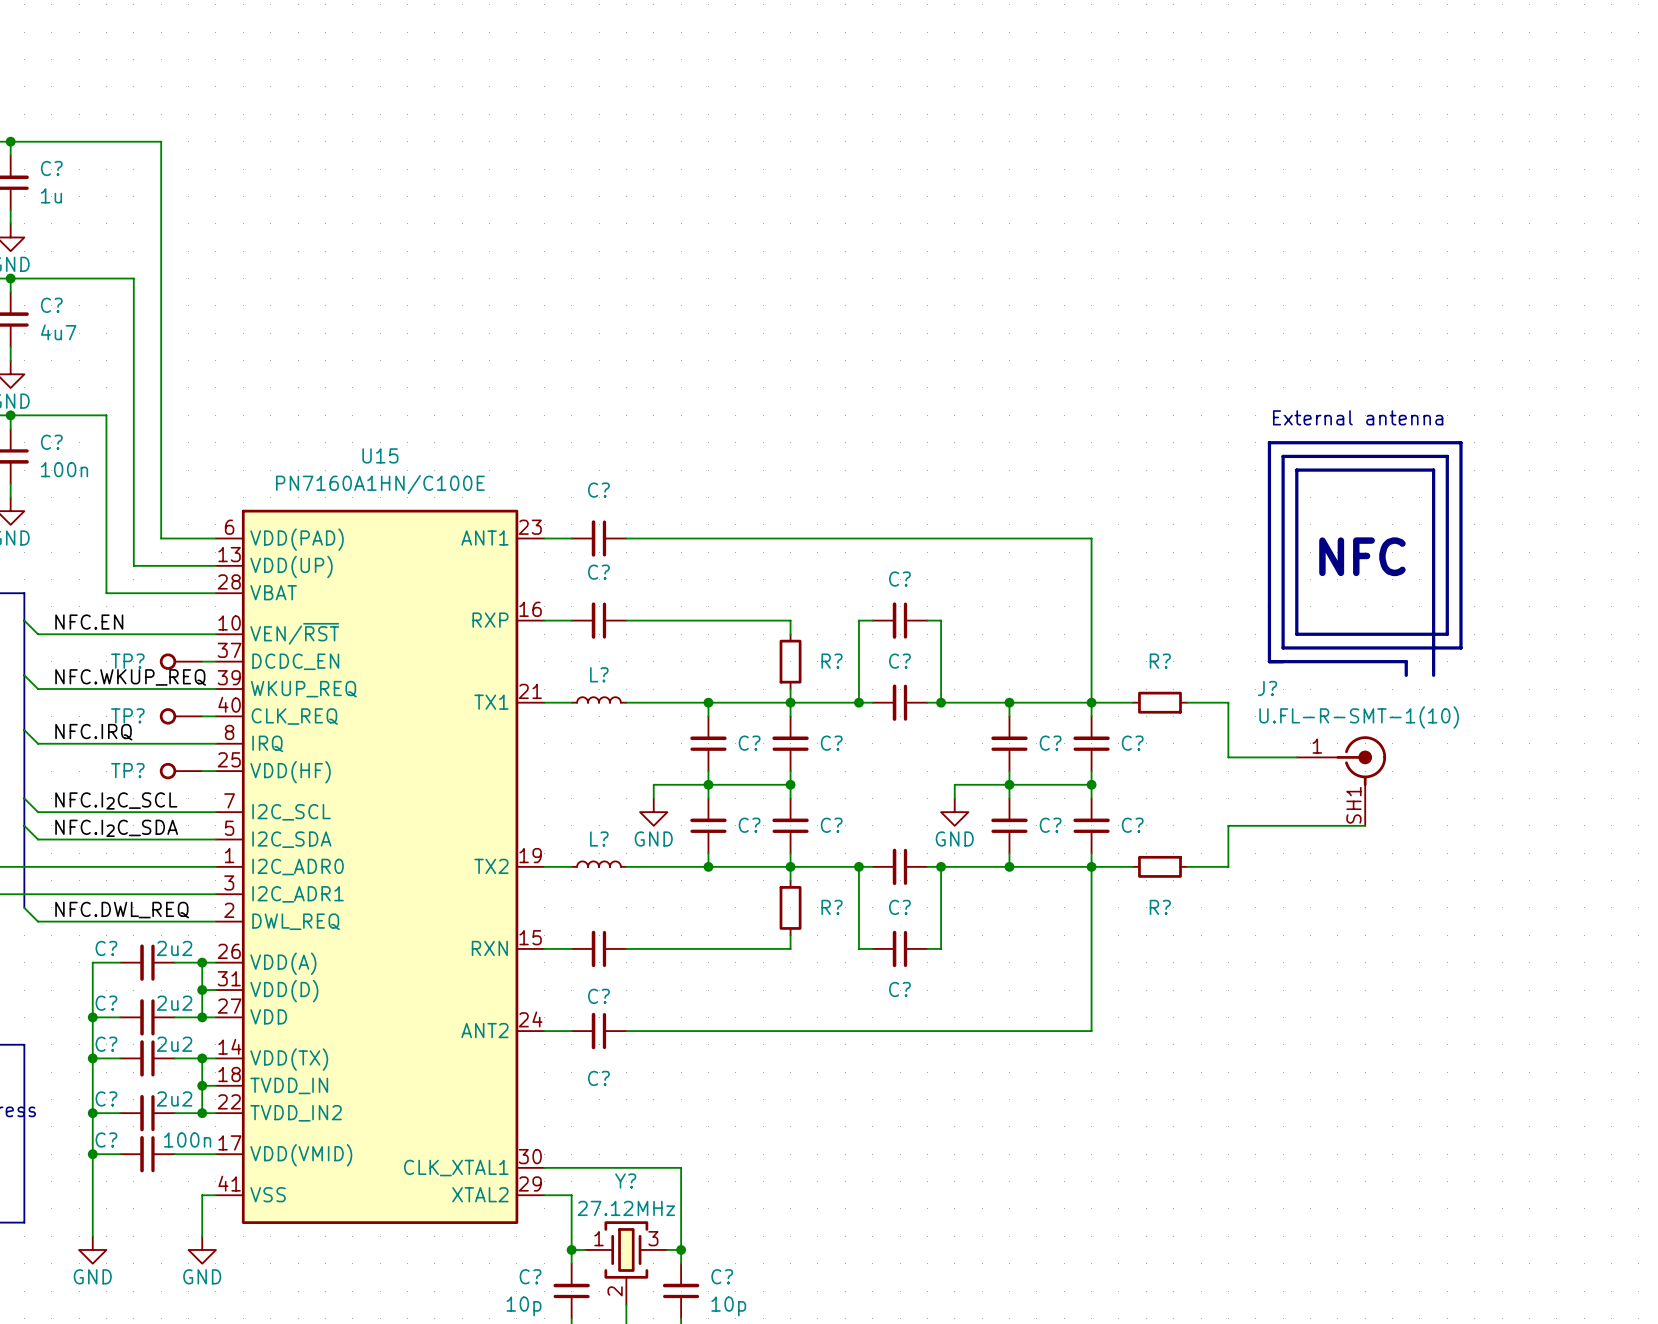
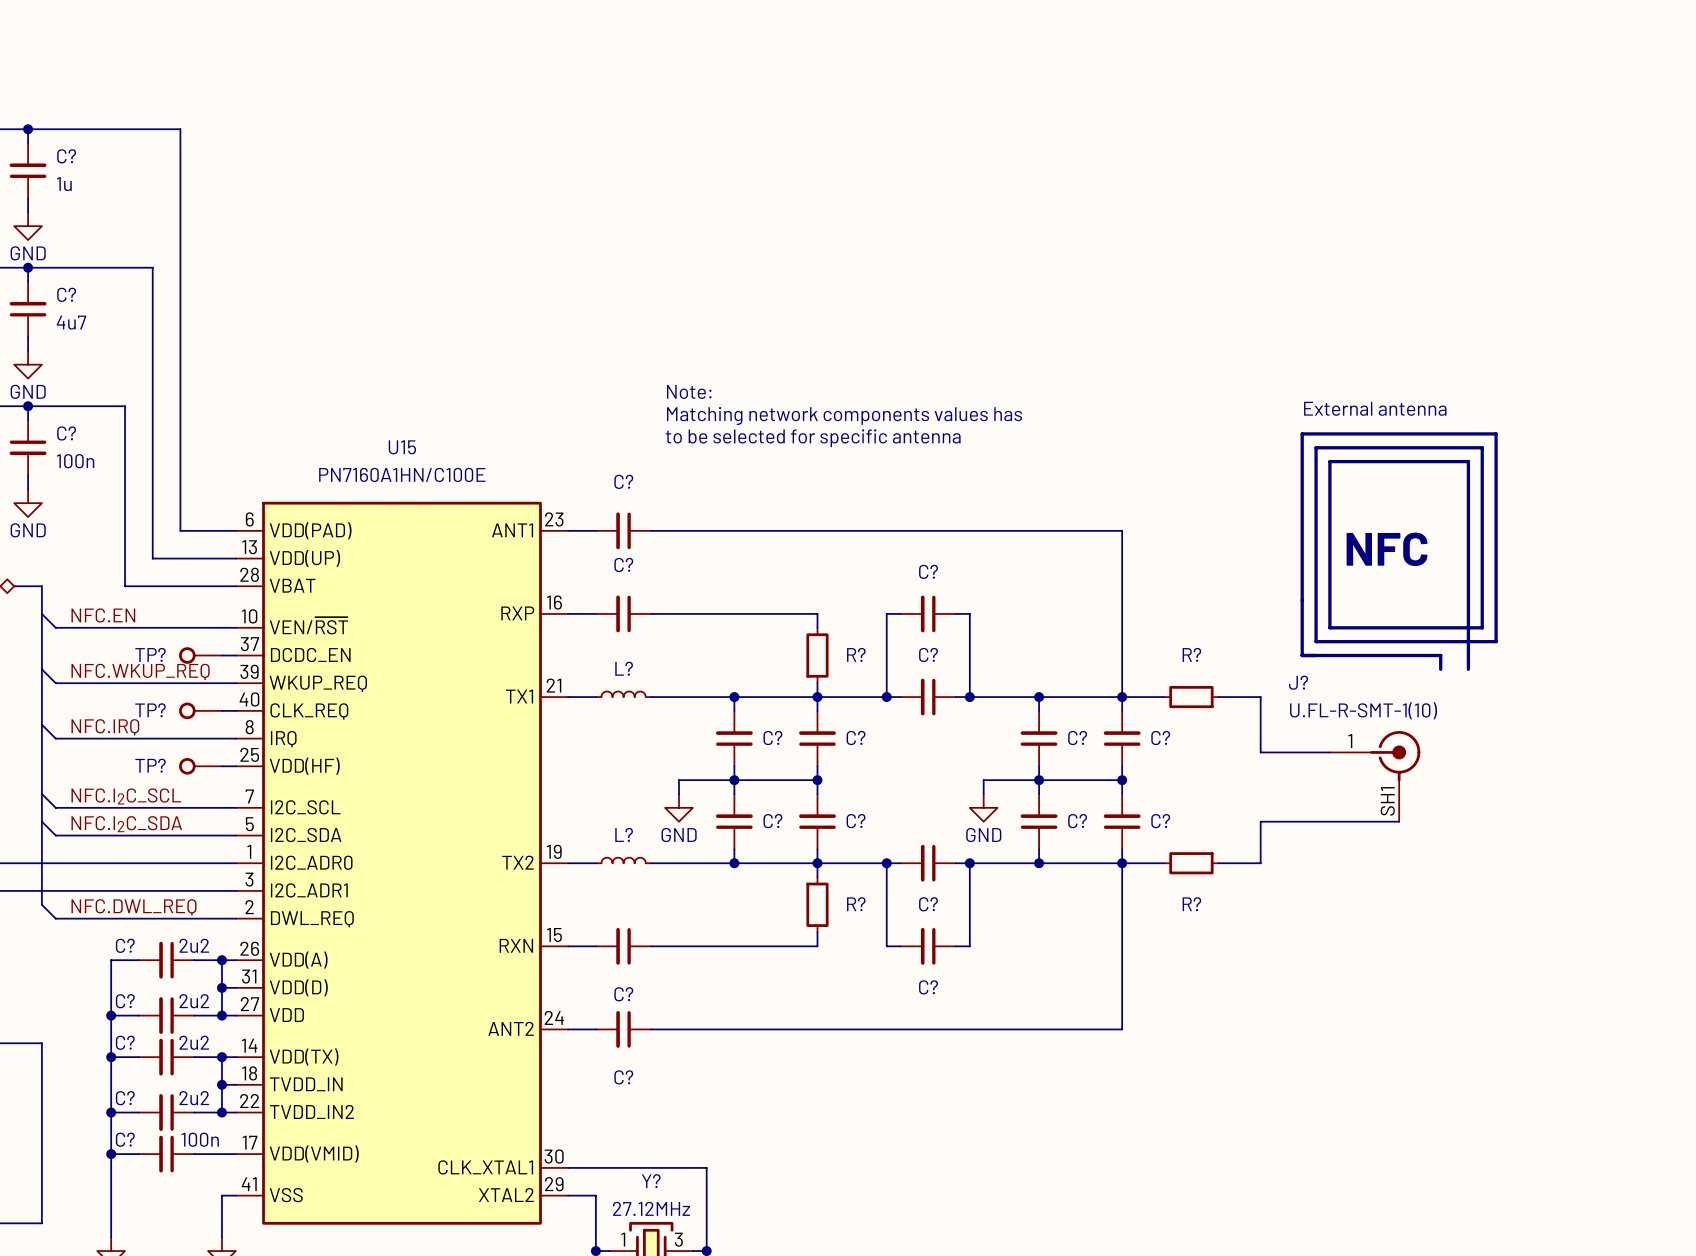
text: none -> Note: (689, 391)
text: none -> Matching network components values has (844, 415)
text: none -> to be selected for specific antenna (813, 438)

